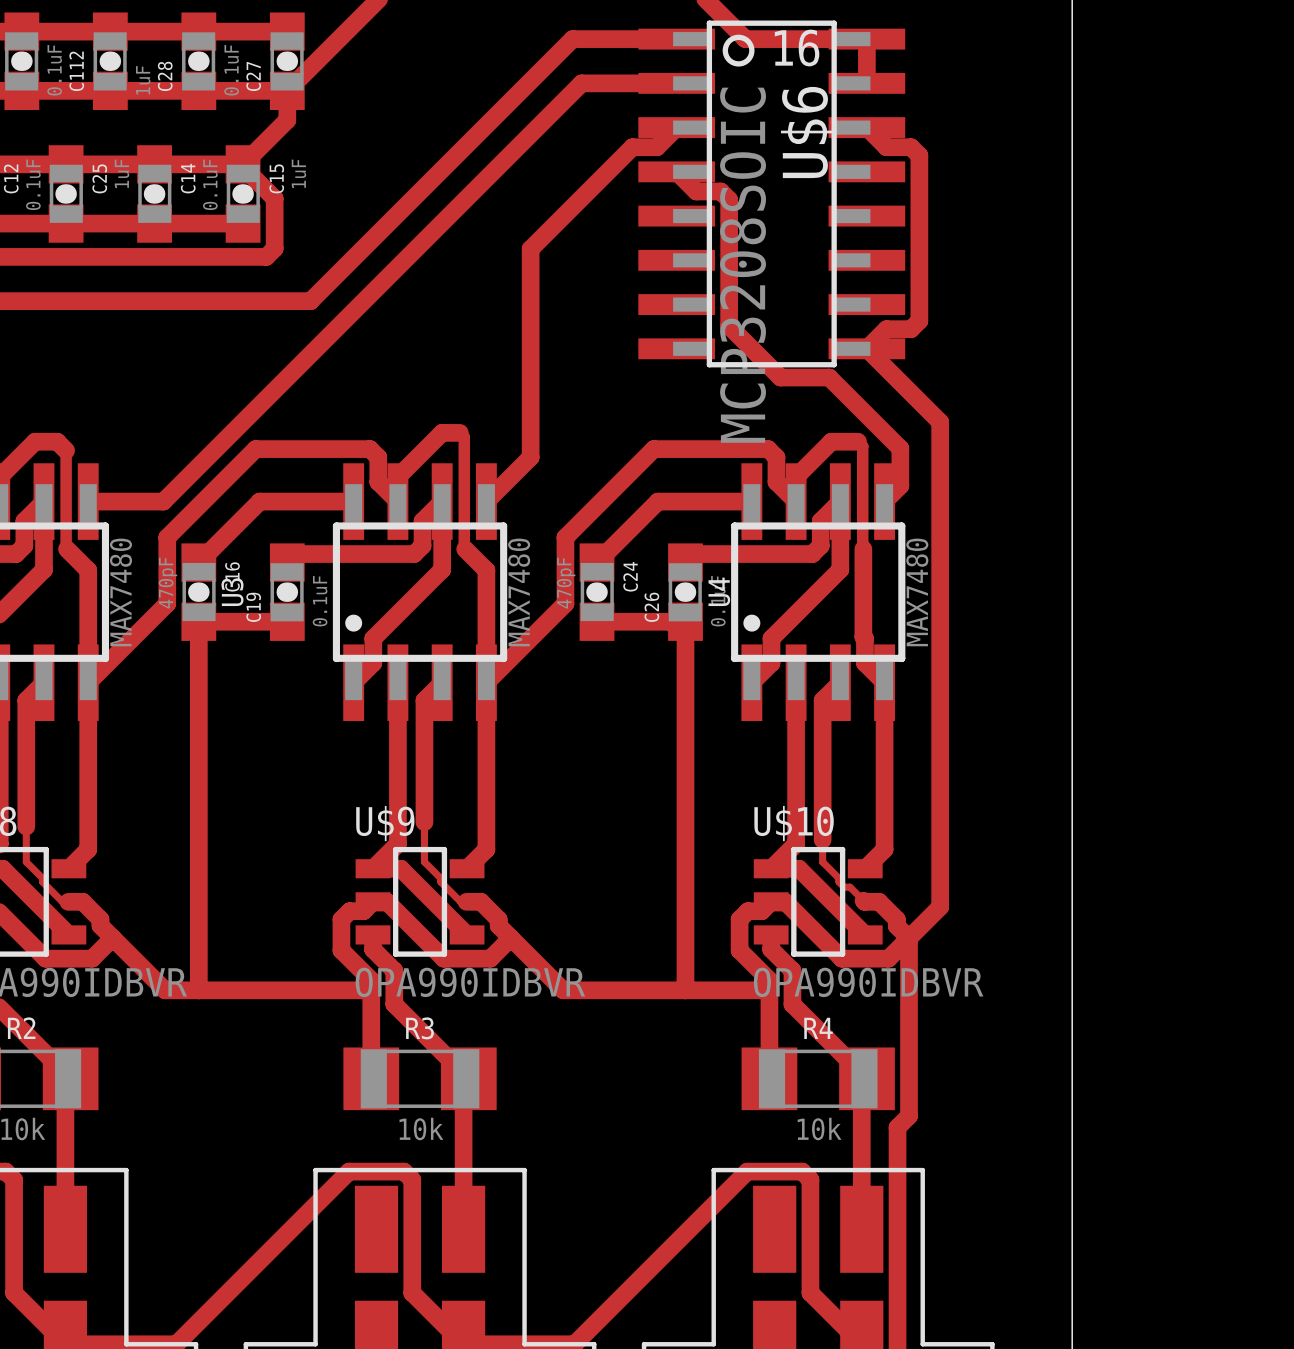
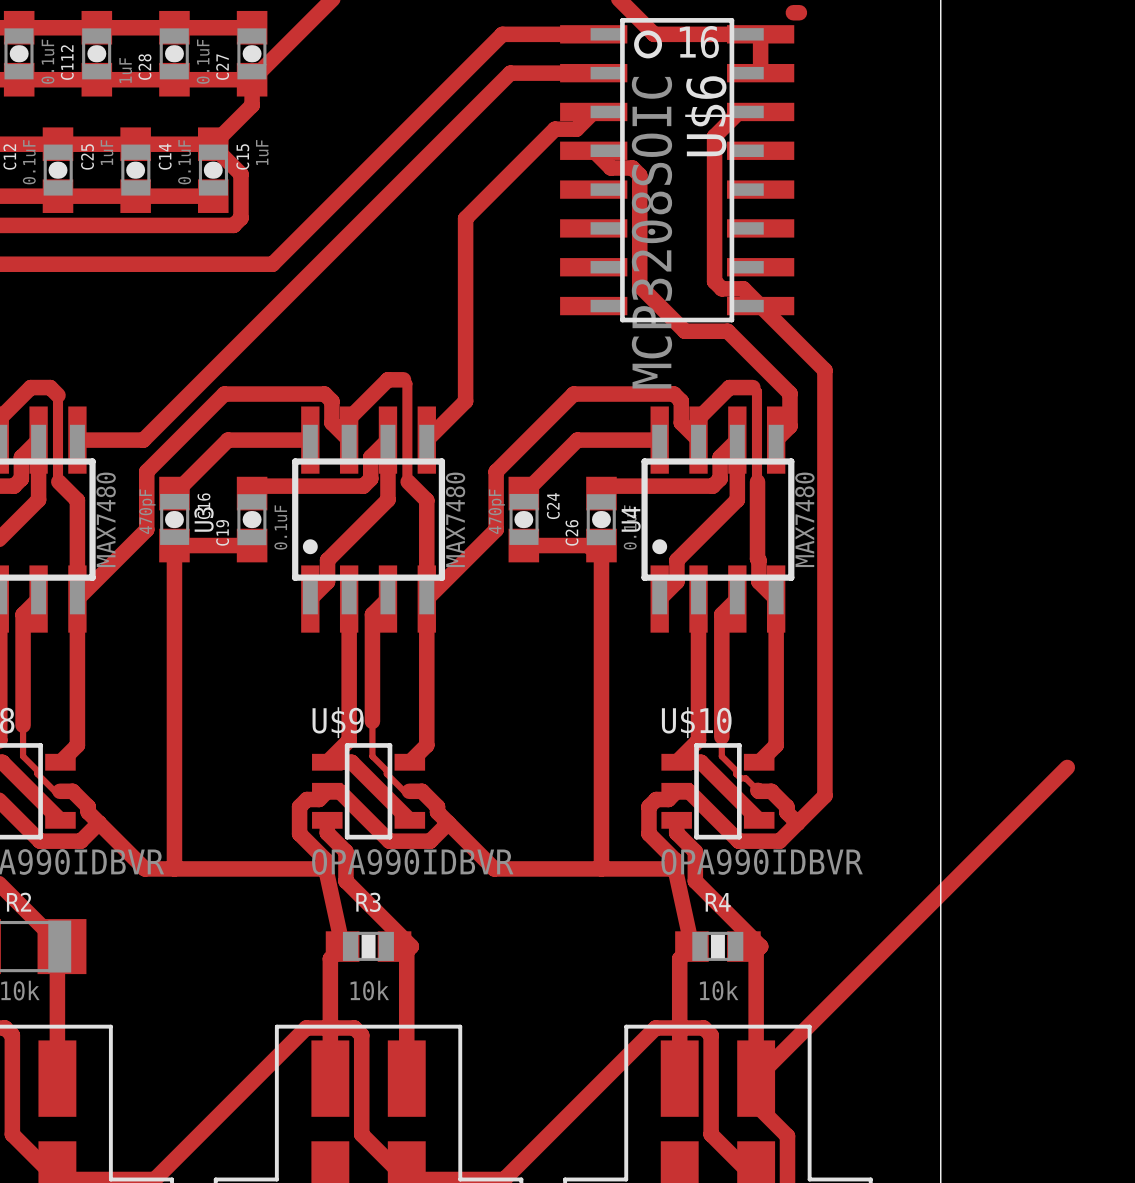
track: none -> (793, 12) (799, 12)
track: (866, 127) (886, 147) (911, 147) (919, 155) (919, 320) (911, 329) (886, 329) (866, 348) -> (760, 111) (739, 111) (714, 136) (714, 281) (721, 288) (743, 288) (760, 306)
track: (909, 938) (909, 1116) (897, 1127) (897, 1294) -> (1067, 767) (756, 1078) (756, 1104) (787, 1136)
track: (371, 990) (371, 1078) -> (325, 868) (342, 946) (330, 958) (330, 1078)
track: (769, 990) (769, 1078) -> (675, 868) (691, 946) (679, 958) (679, 1078)
R3 footprint: [343, 1047, 497, 1111] -> [325, 931, 412, 962]
R4 footprint: [741, 1047, 895, 1111] -> [675, 931, 761, 962]

